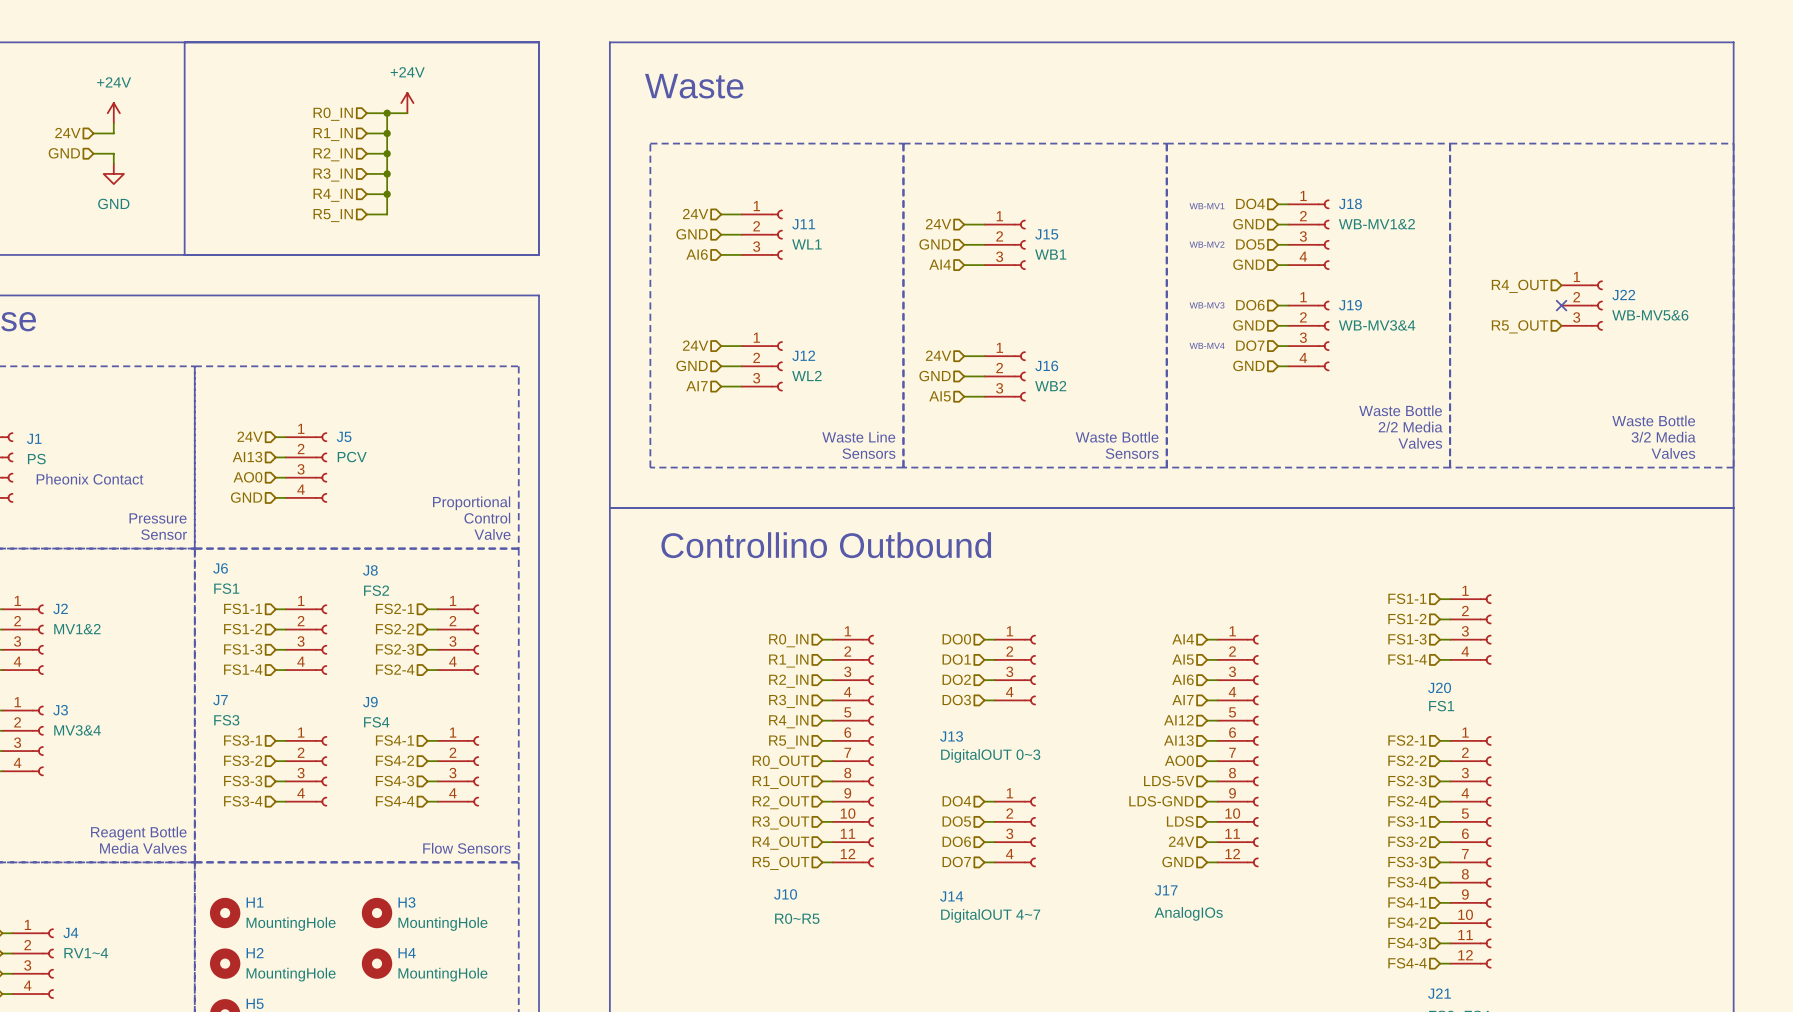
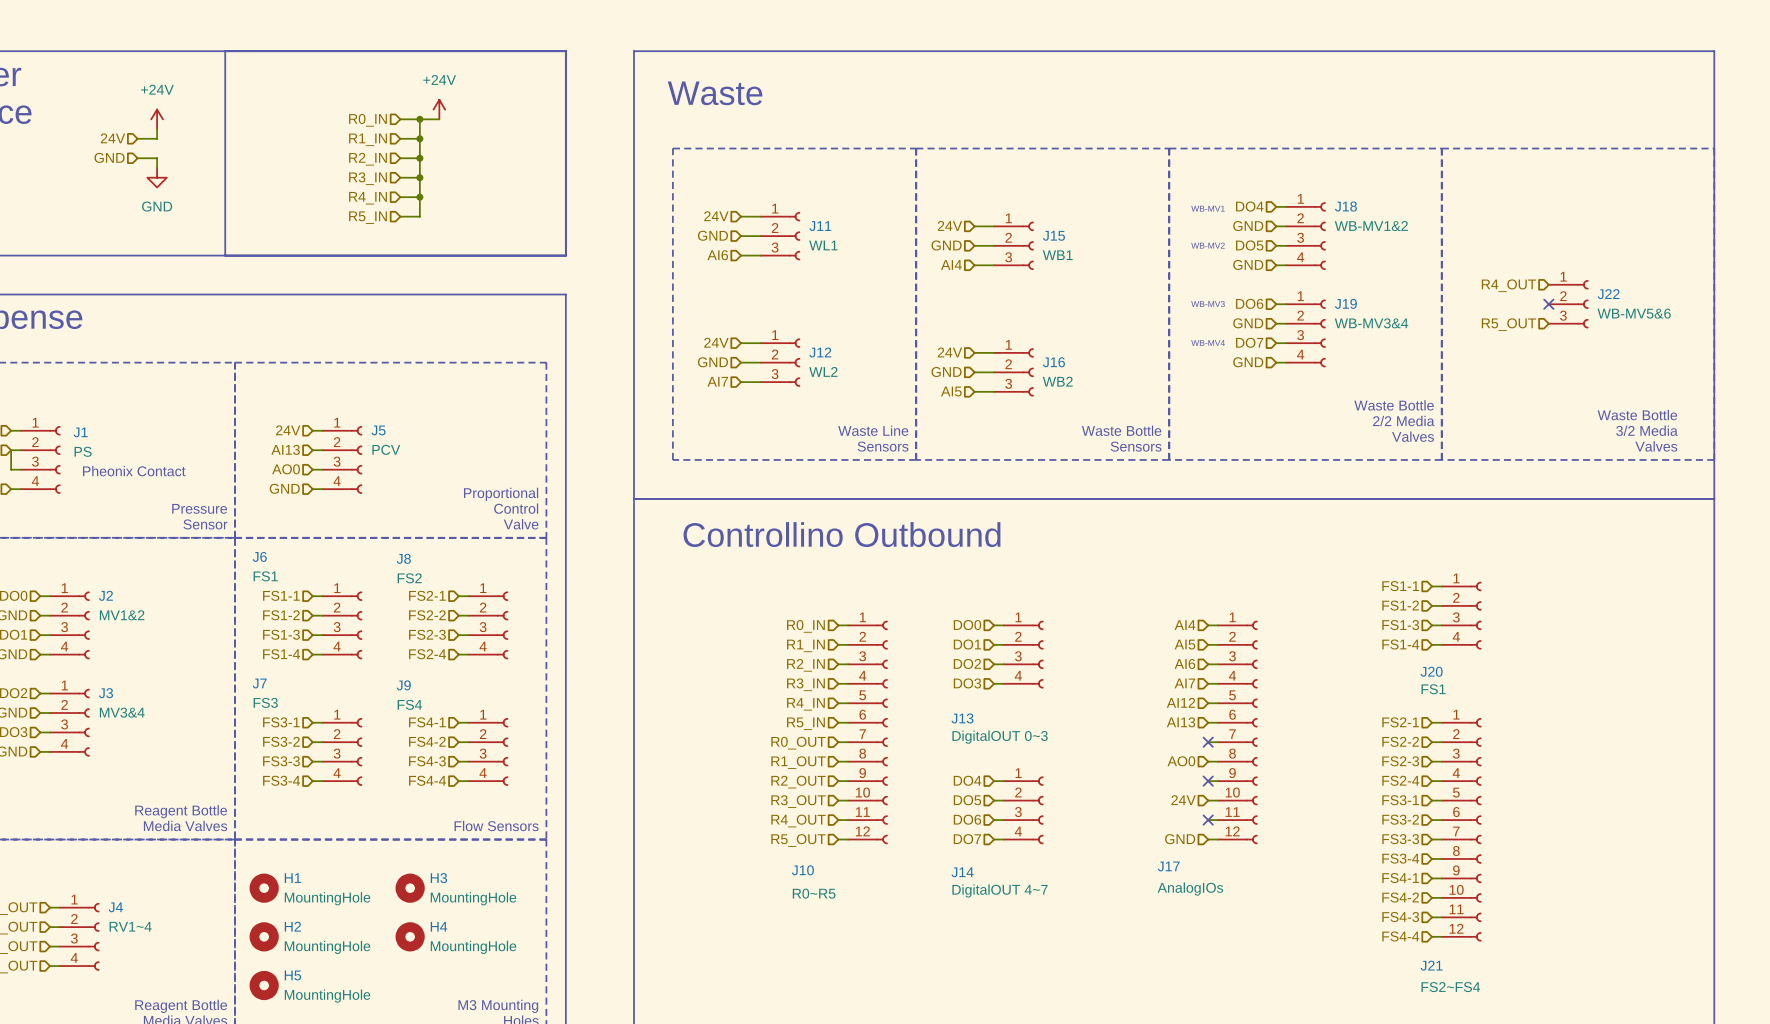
hierarchical label: AO0 (1179, 760) -> none
no-connect mark: none -> (1208, 742)
hierarchical label: LDS-5V (1169, 781) -> AO0 (1181, 761)
hierarchical label: LDS-GND (1161, 801) -> none
no-connect mark: none -> (1208, 781)
hierarchical label: LDS (1180, 821) -> 24V (1183, 800)
hierarchical label: 24V (1181, 841) -> none
no-connect mark: none -> (1208, 820)

